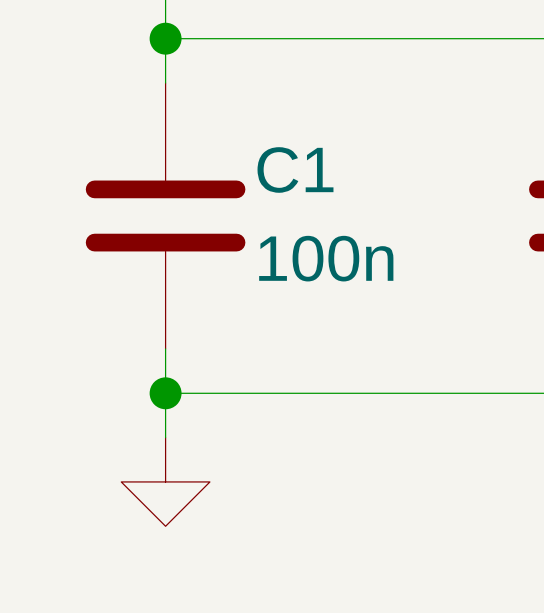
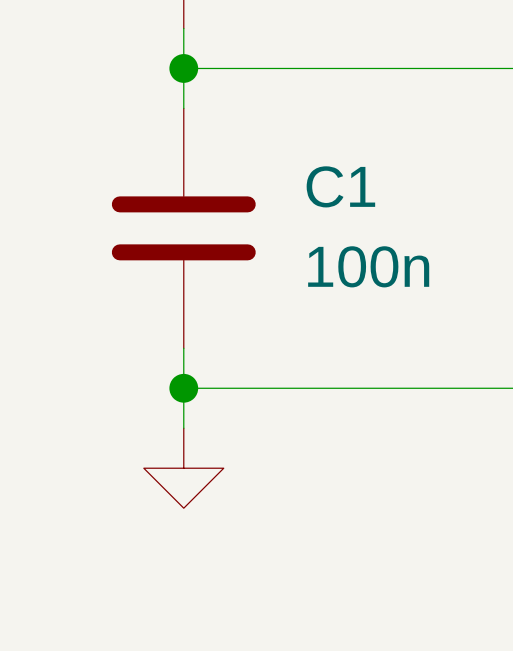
C1 name position: C1 (295, 169) -> C1 (340, 186)
C1 value position: 100n (326, 258) -> 100n (368, 266)

